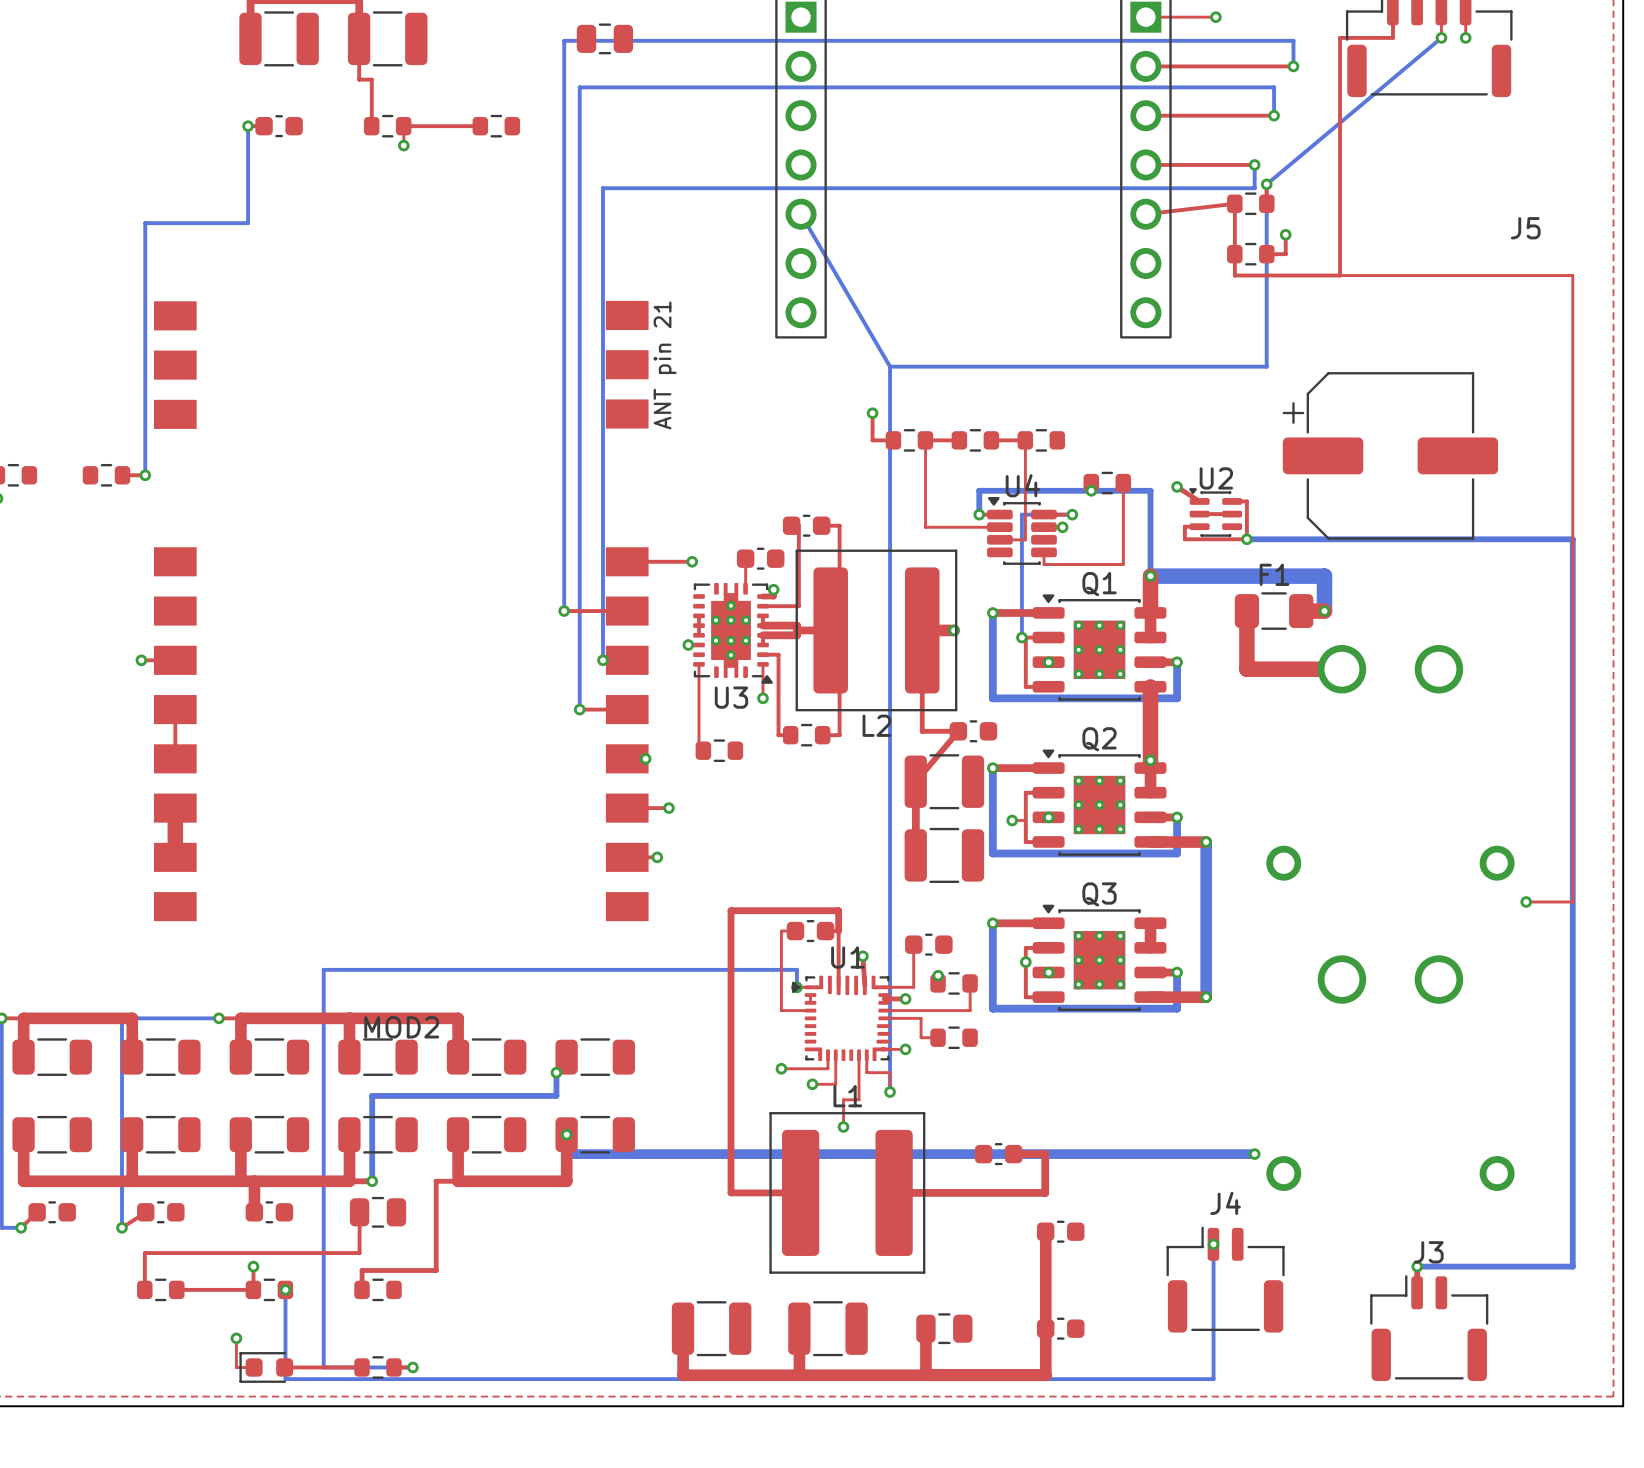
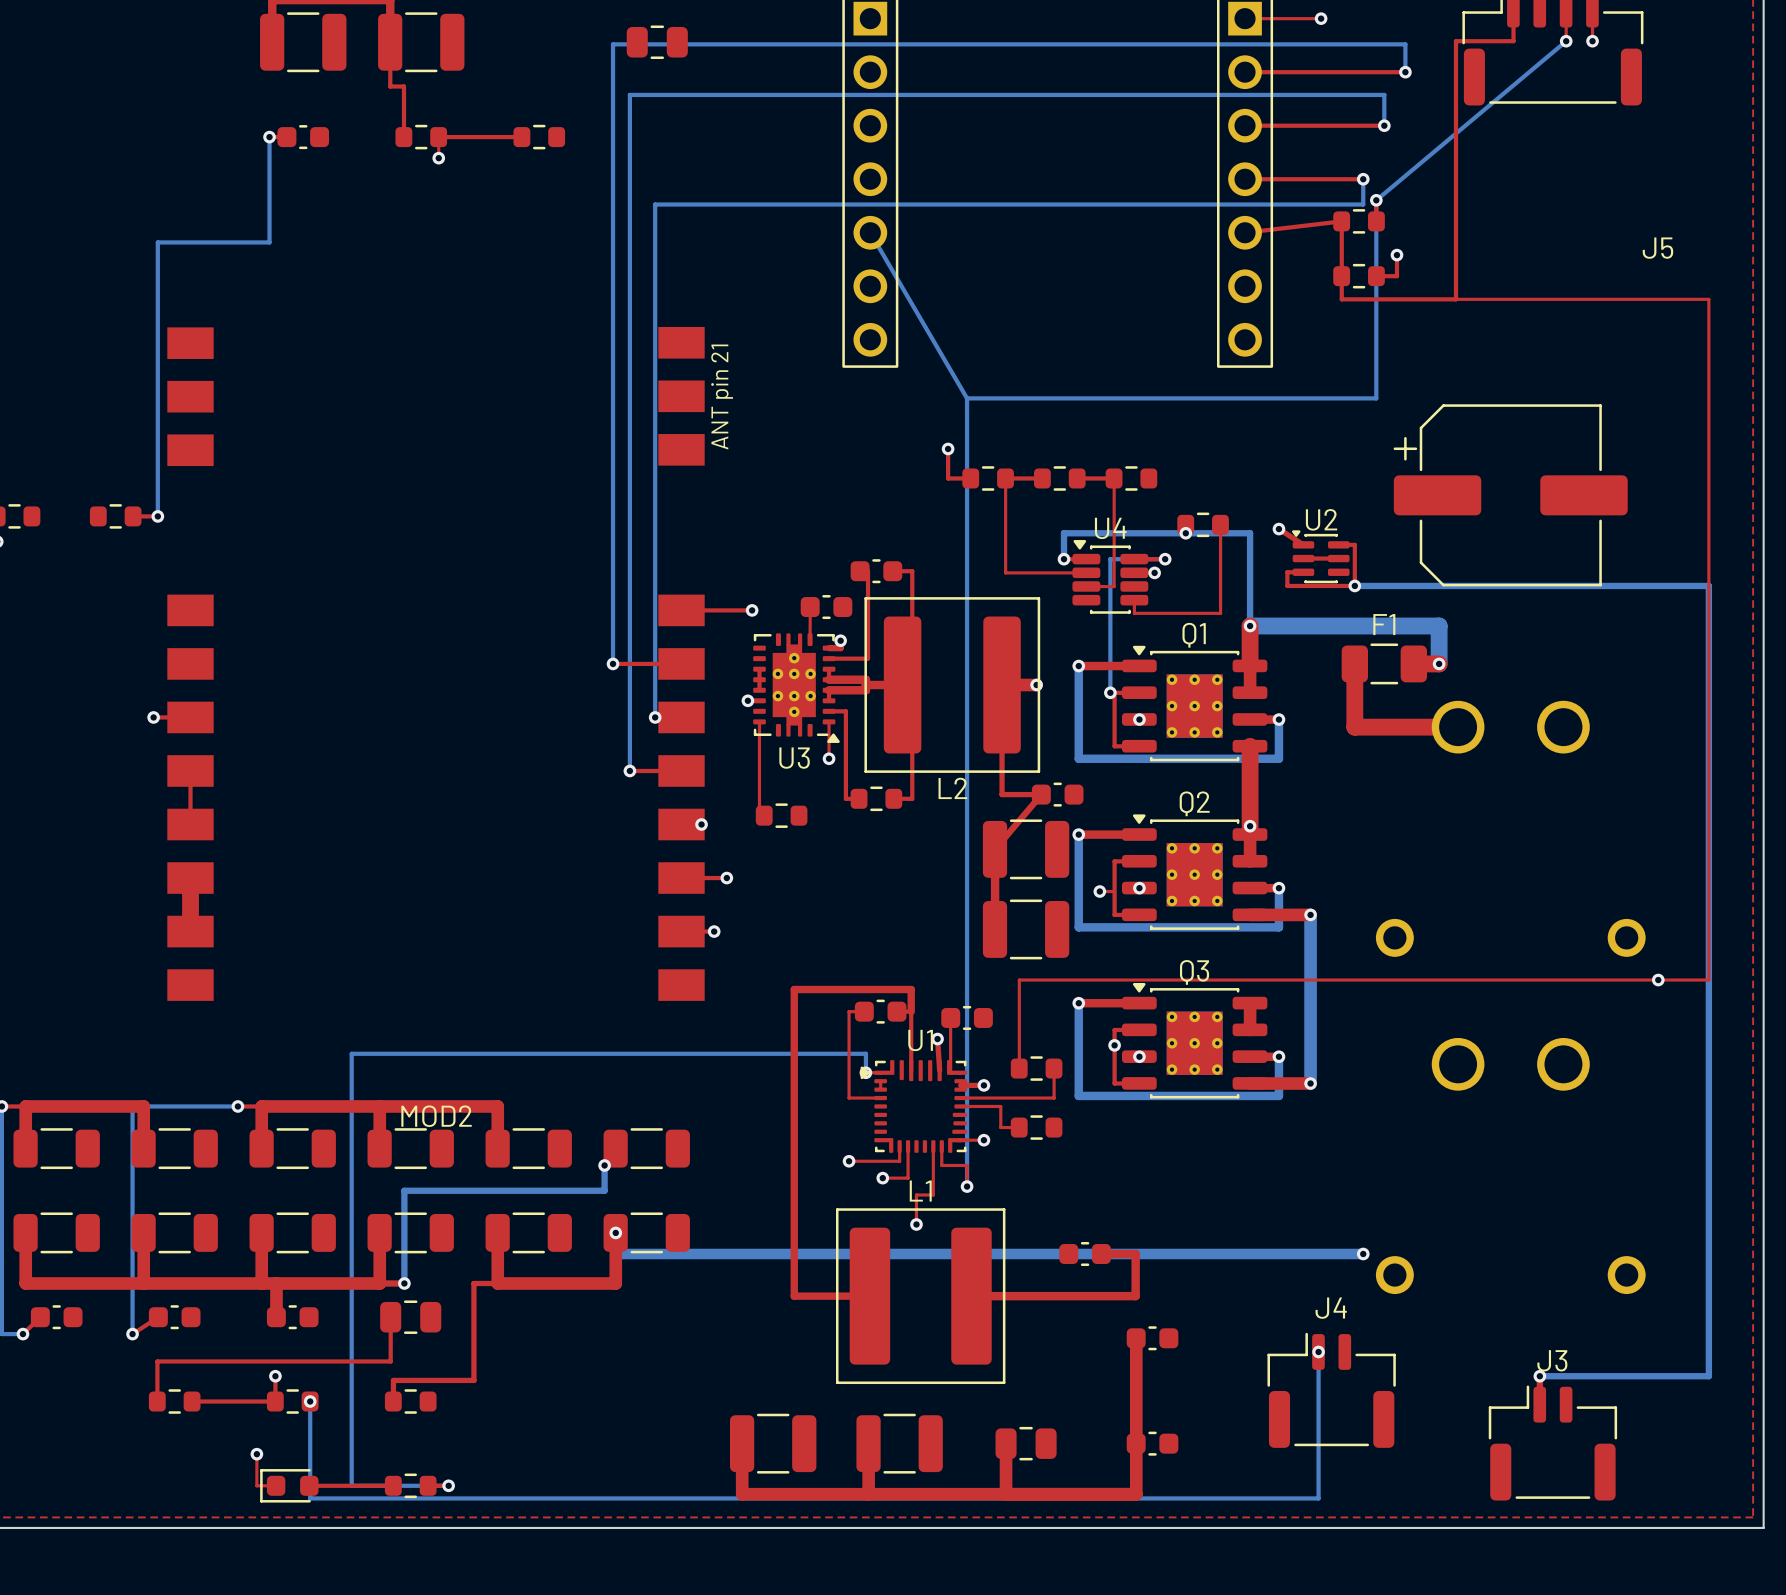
top track: none -> (1658, 980) (1019, 980) (1019, 1060)
top track: (913, 944) (913, 987) (883, 987) -> (950, 1017) (950, 1072) (959, 1072)
part position: (928, 944) -> (967, 1017)
via: (938, 975) -> none

